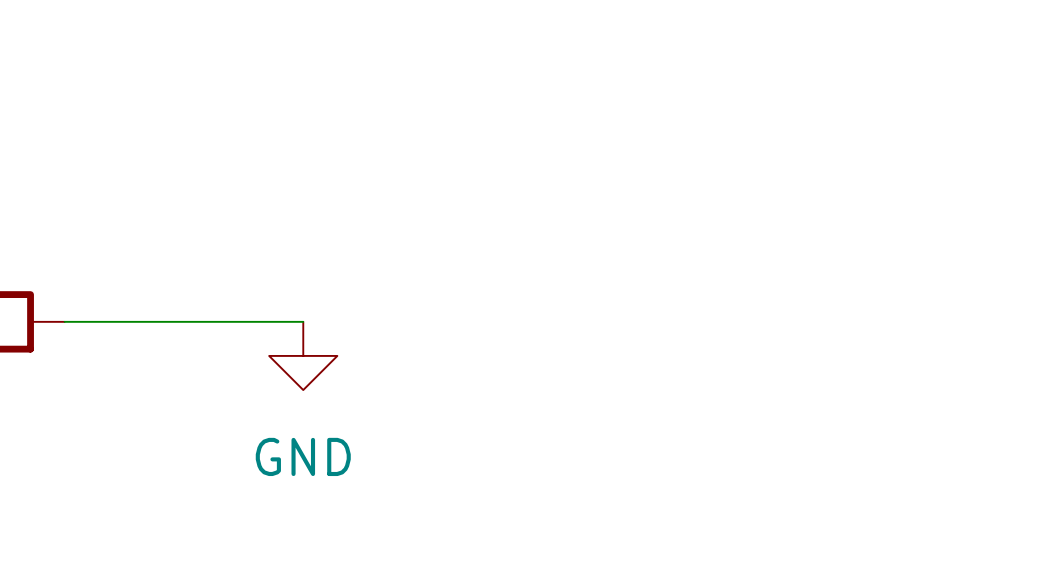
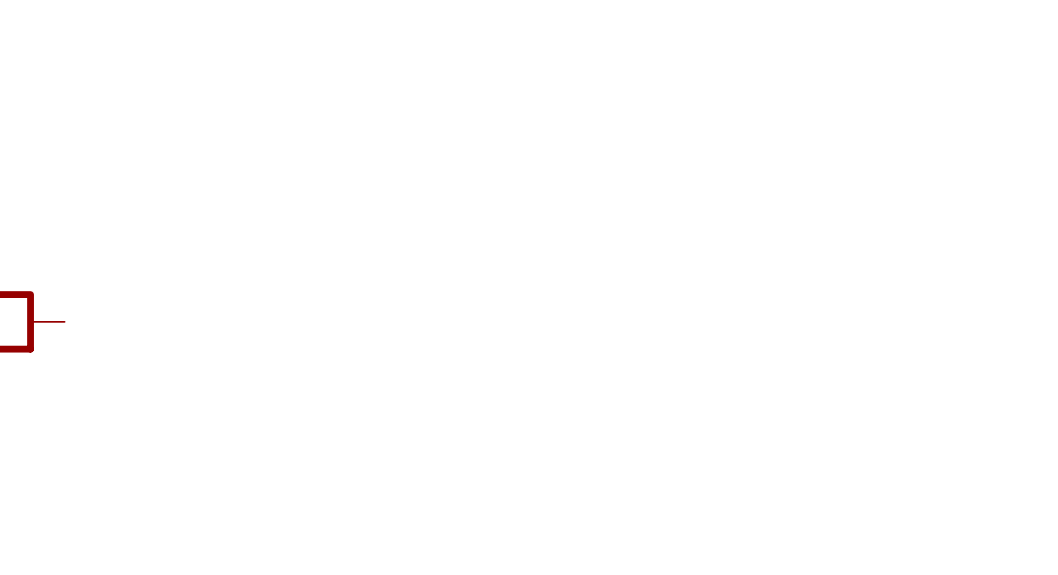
wire: (64, 321) (303, 321) -> none
power symbol: GND (303, 355) -> none

